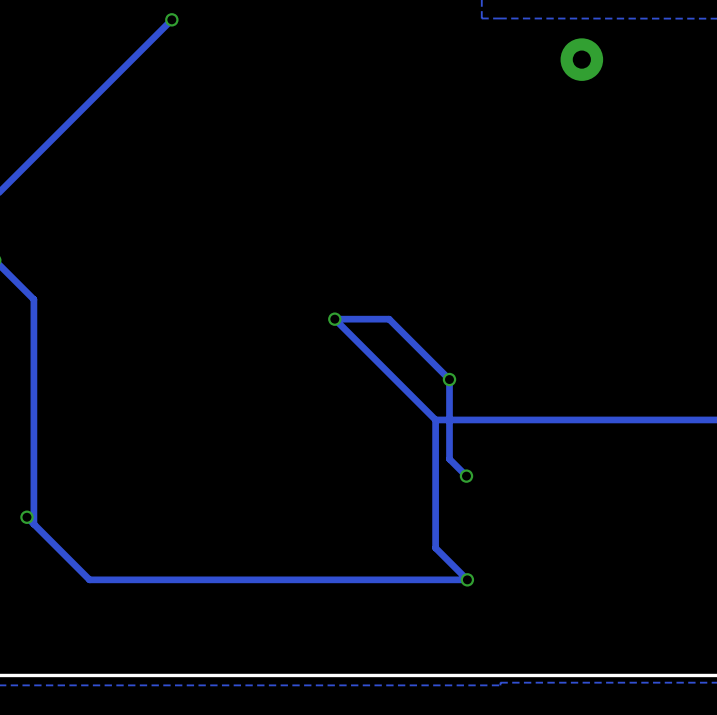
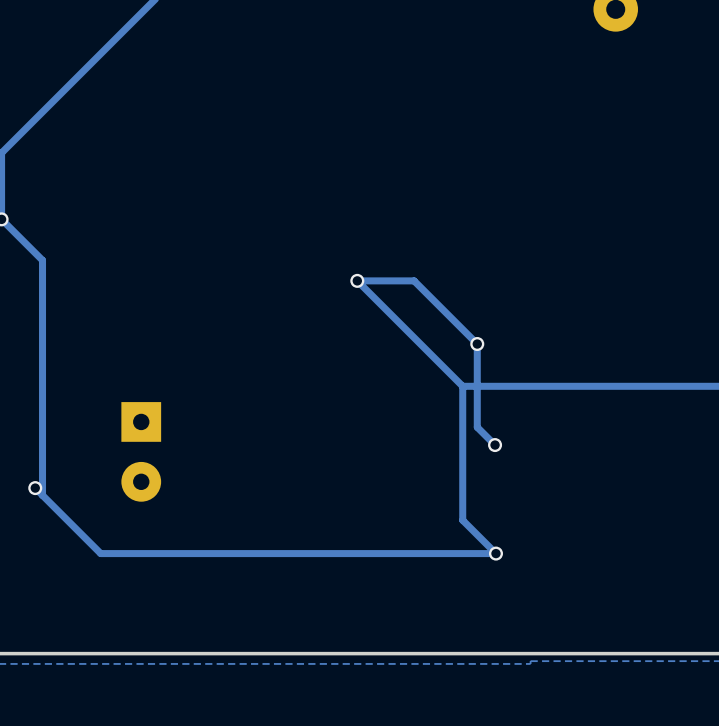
part: none -> (141, 451)

